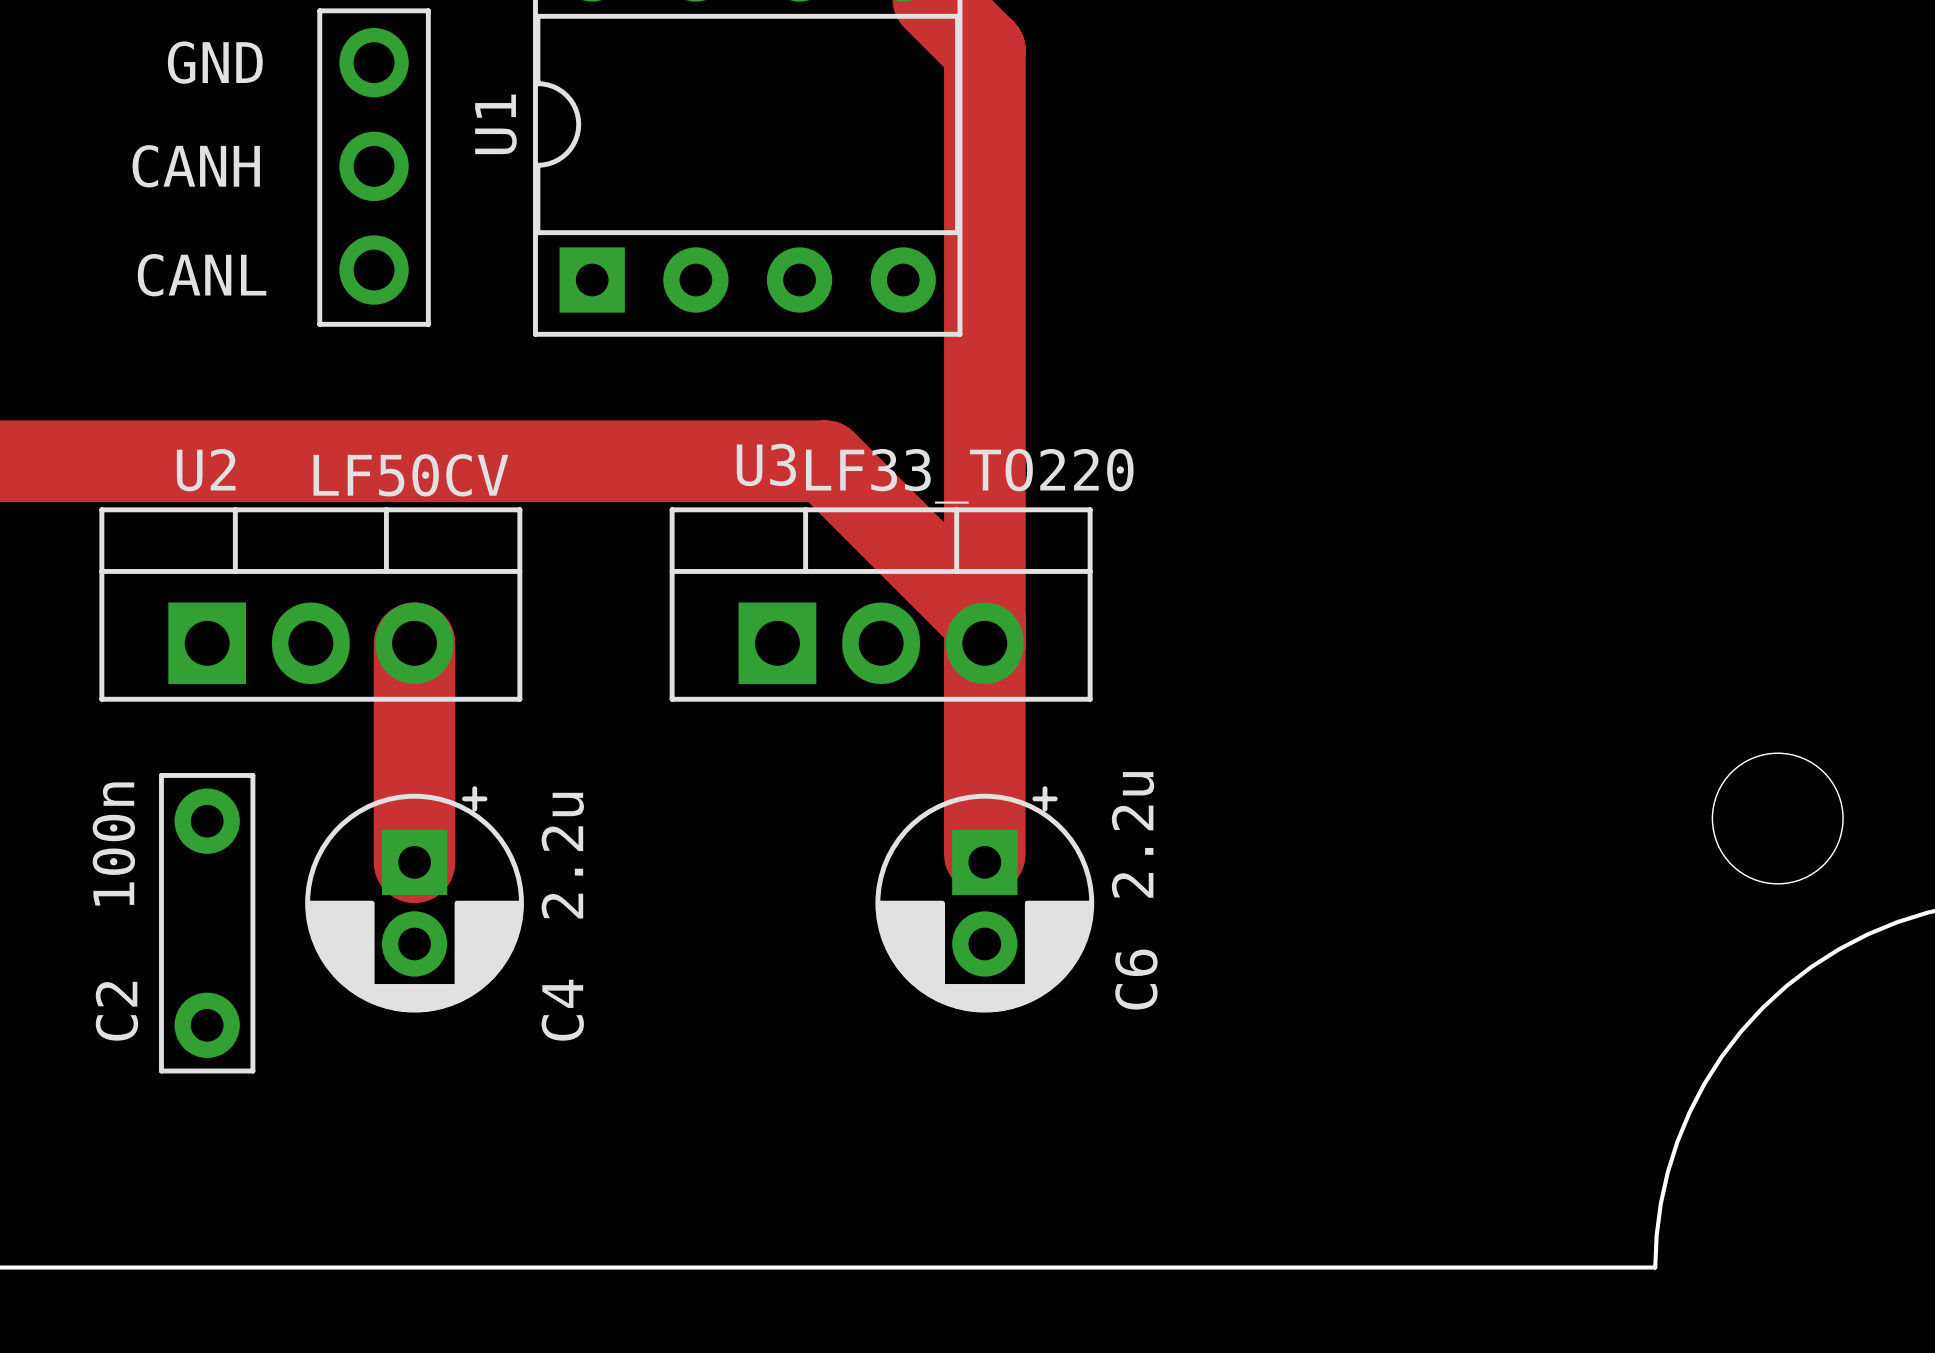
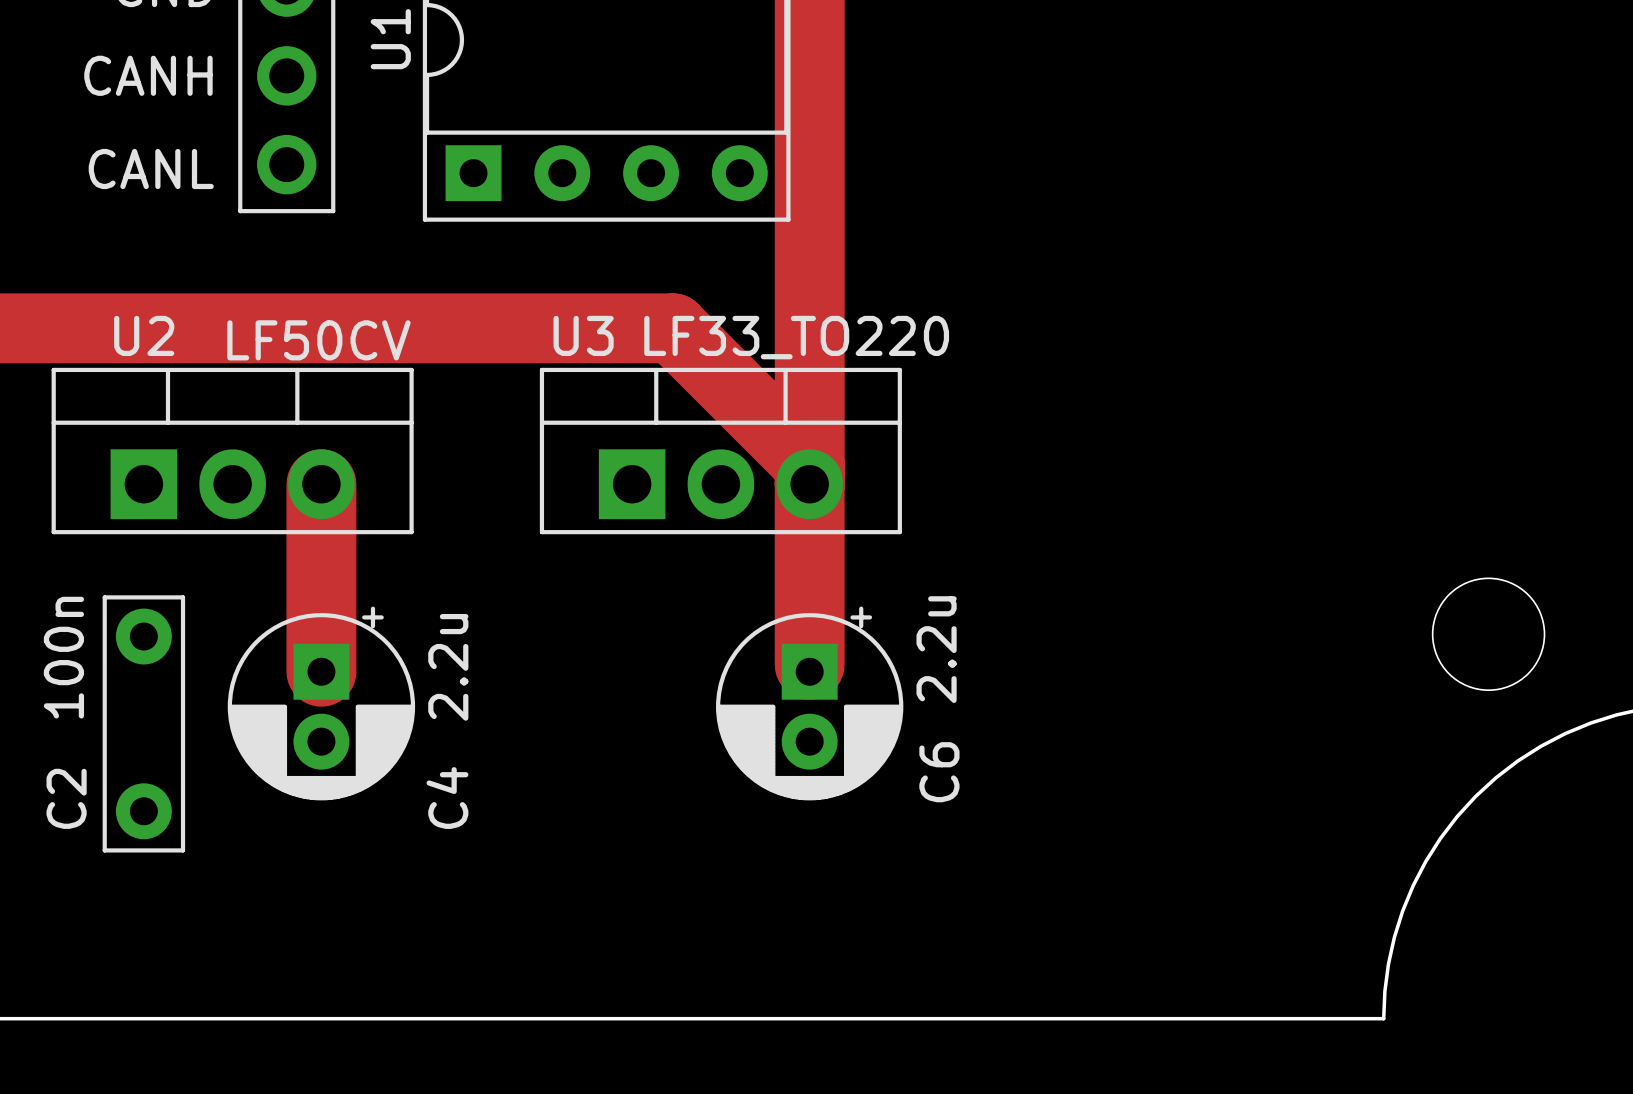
U3 name position: U3 (766, 464) -> U3 (583, 335)

